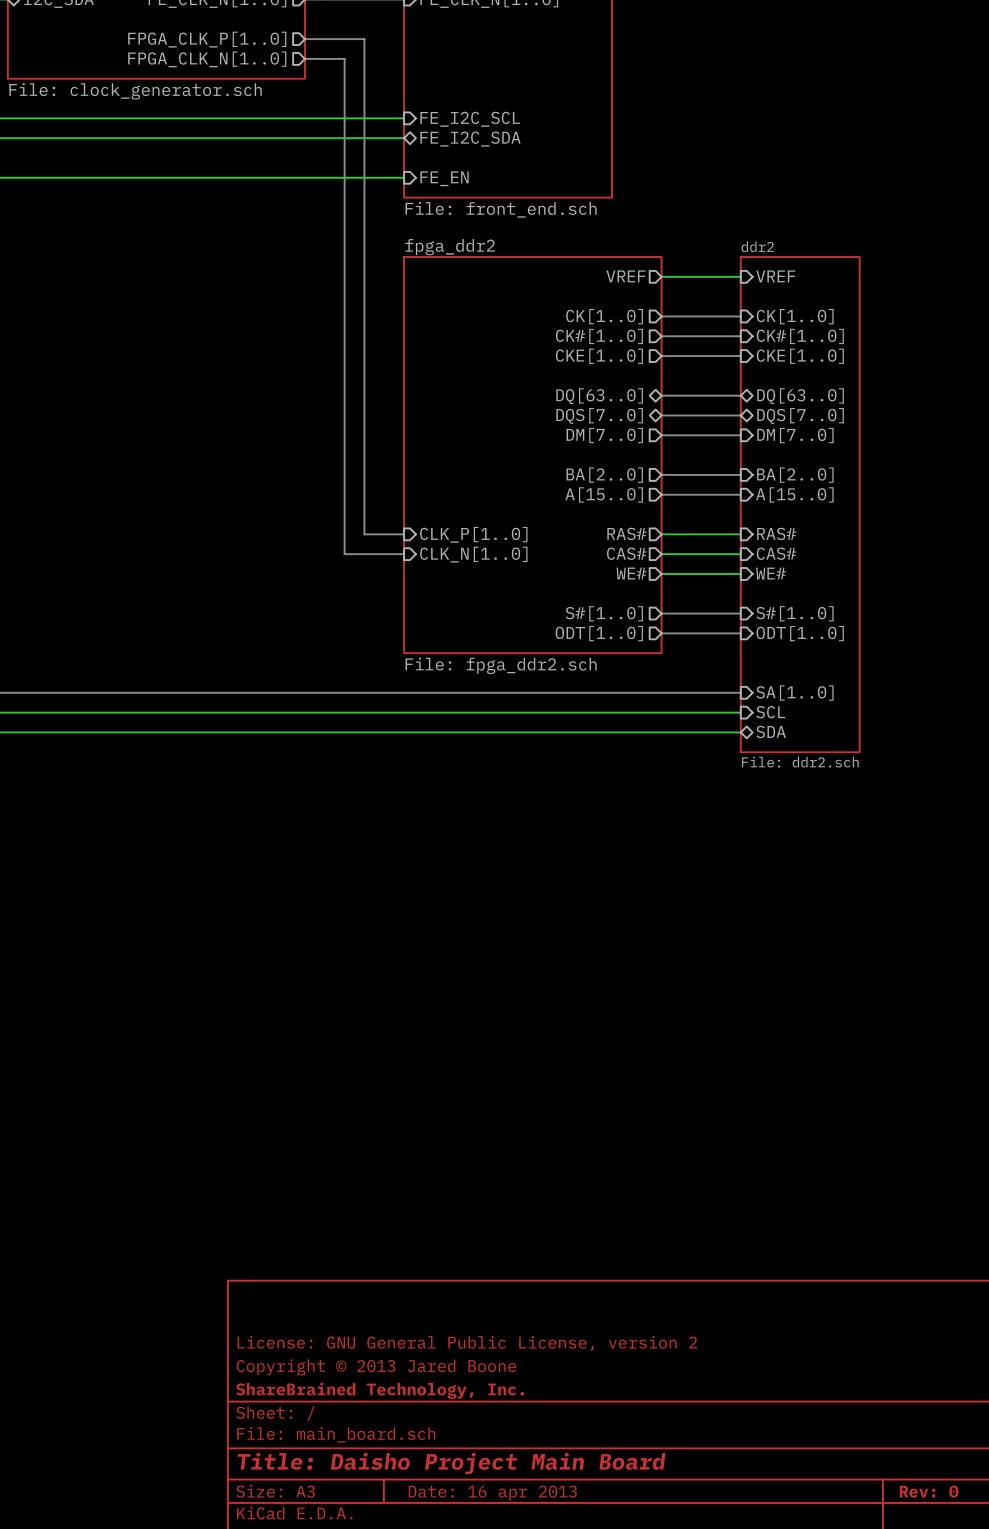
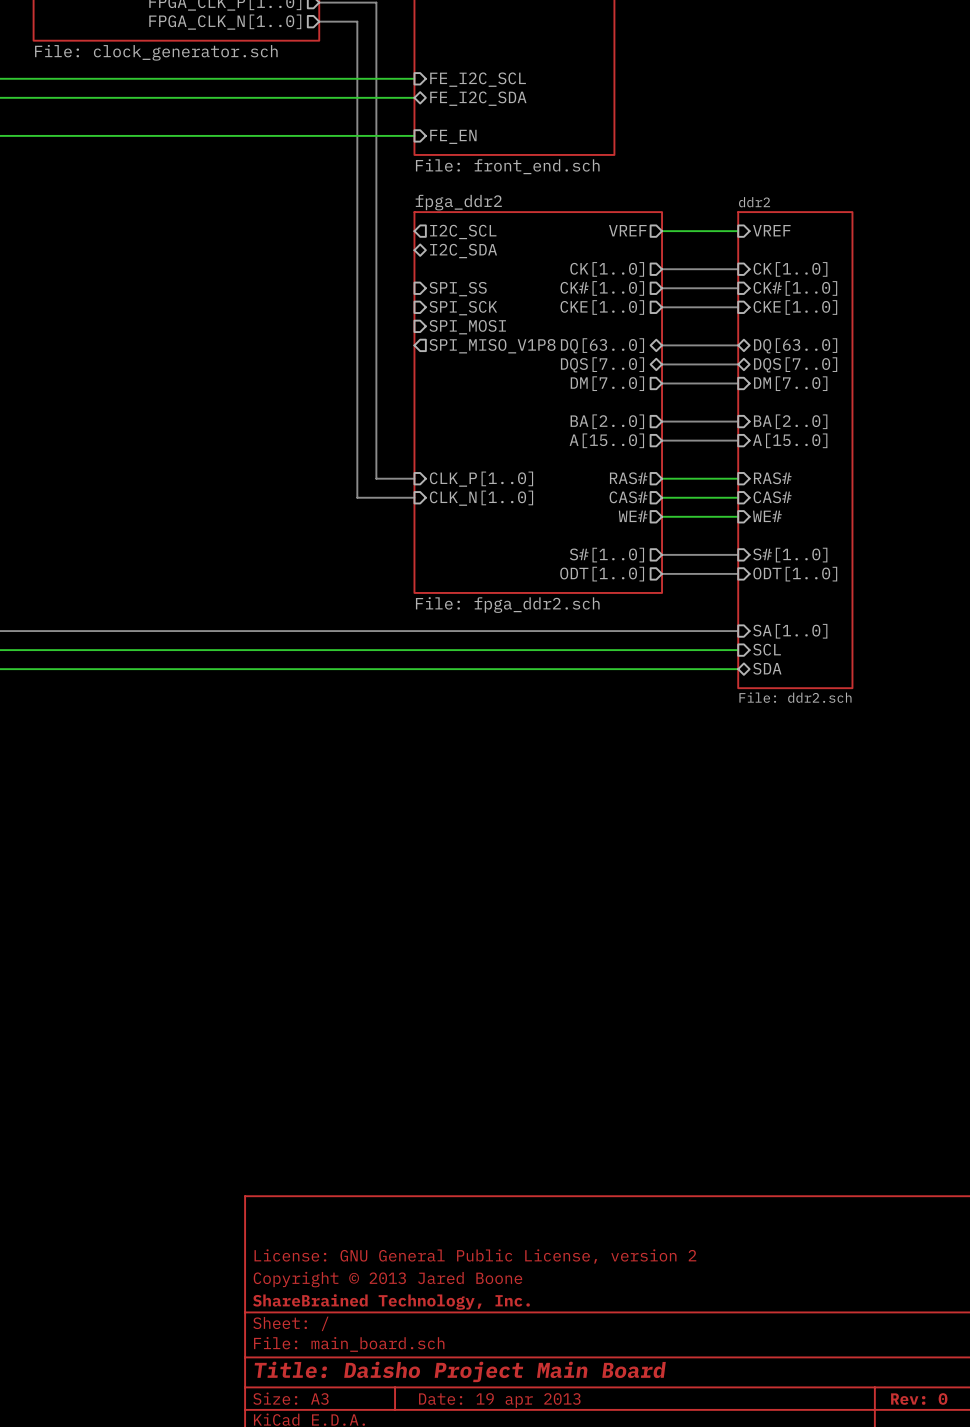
sheet pin: none -> I2C_SCL (463, 231)
sheet pin: none -> I2C_SDA (463, 251)
sheet pin: none -> SPI_SS (458, 289)
sheet pin: none -> SPI_SCK (463, 308)
sheet pin: none -> SPI_MOSI (467, 327)
sheet pin: none -> SPI_MISO_V1P8 (492, 346)
title block: Date: 16 apr 2013 (492, 1493) -> Date: 19 apr 2013 (499, 1400)

